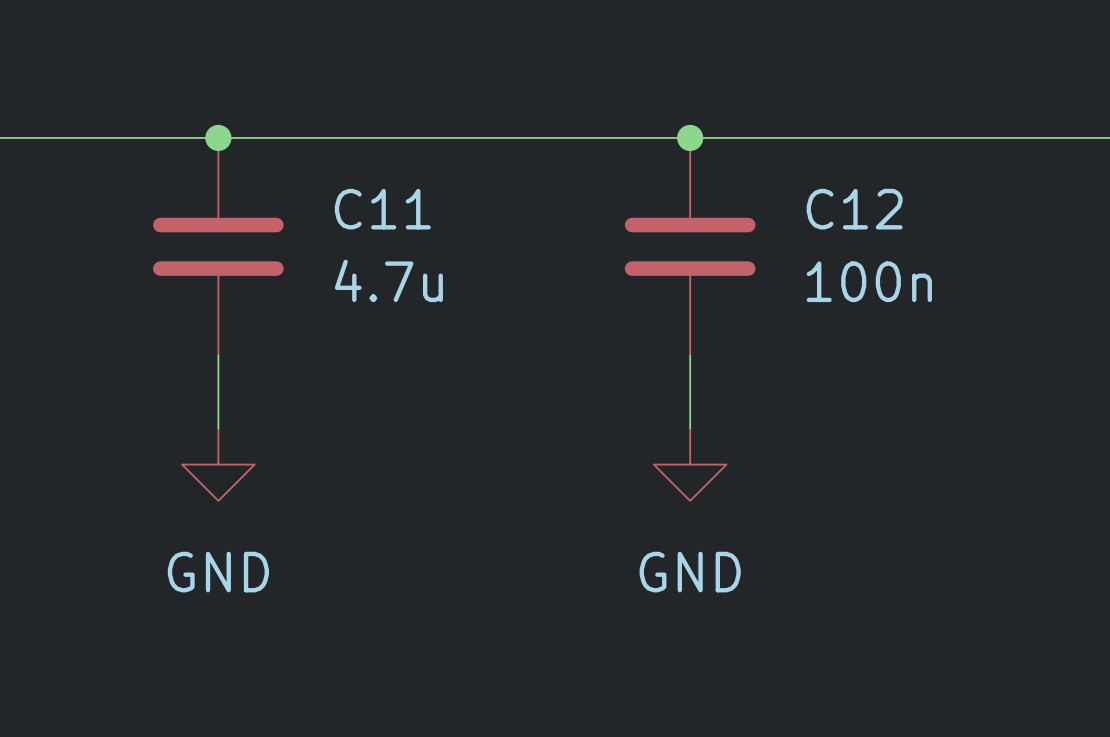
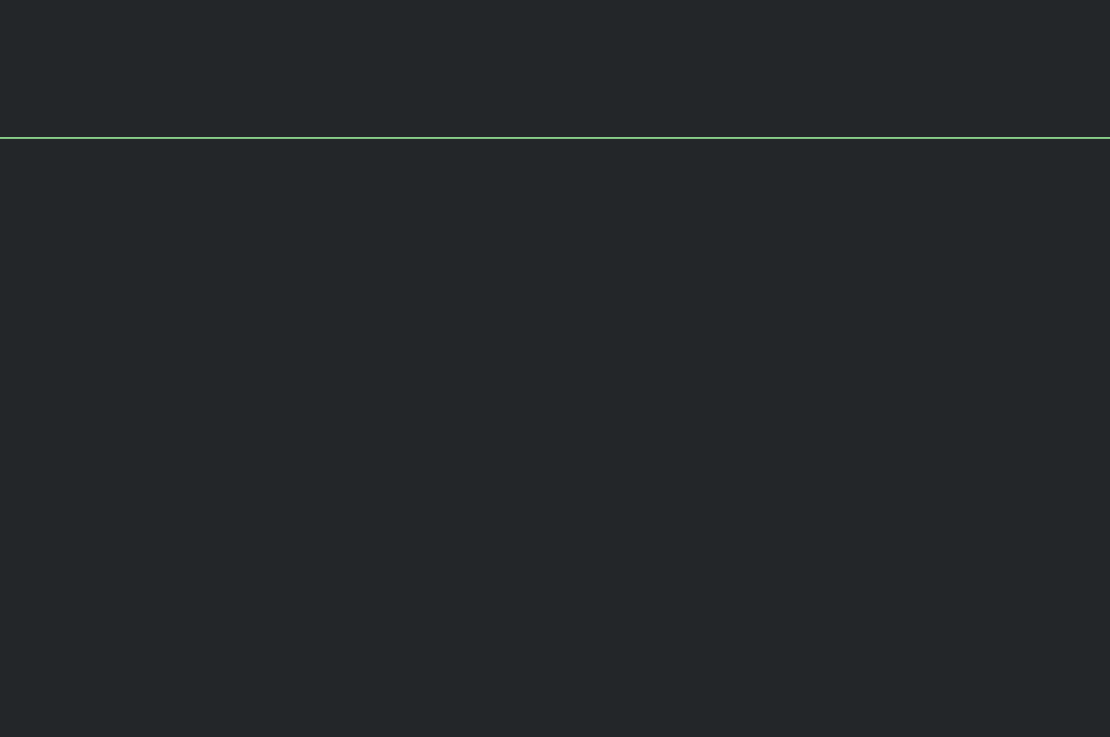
junction: (218, 137) -> none
junction: (690, 137) -> none
C11: 4.7u (218, 246) -> none
C12: 100n (690, 246) -> none
wire: (218, 355) (218, 428) -> none
wire: (690, 355) (690, 428) -> none
power symbol: GND (218, 464) -> none
power symbol: GND (690, 464) -> none

